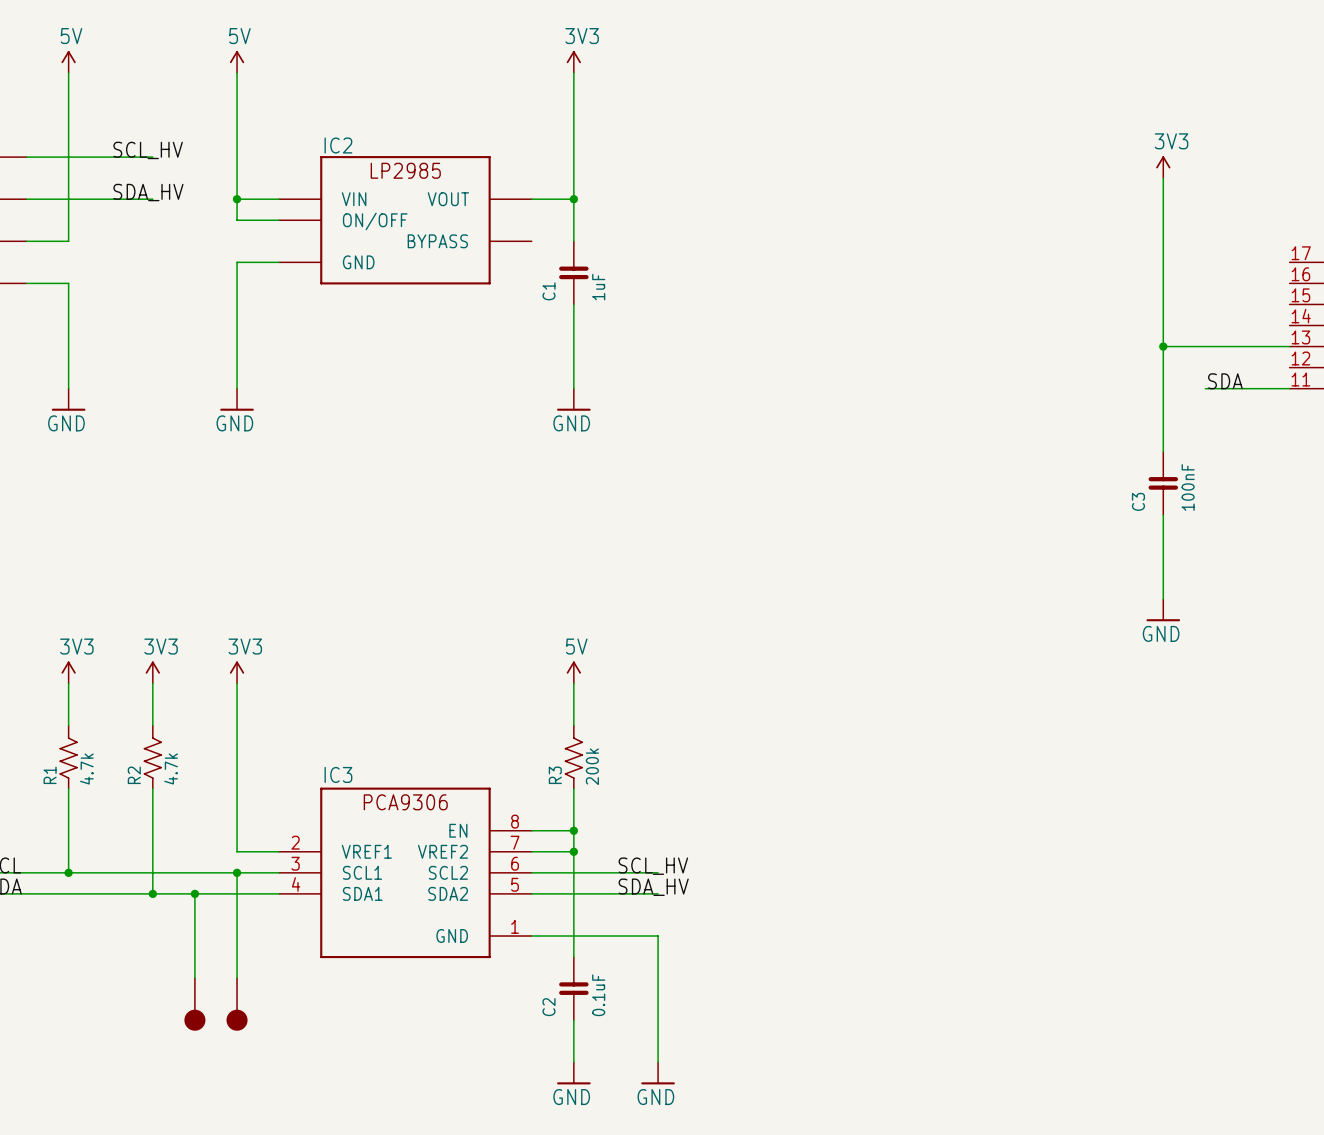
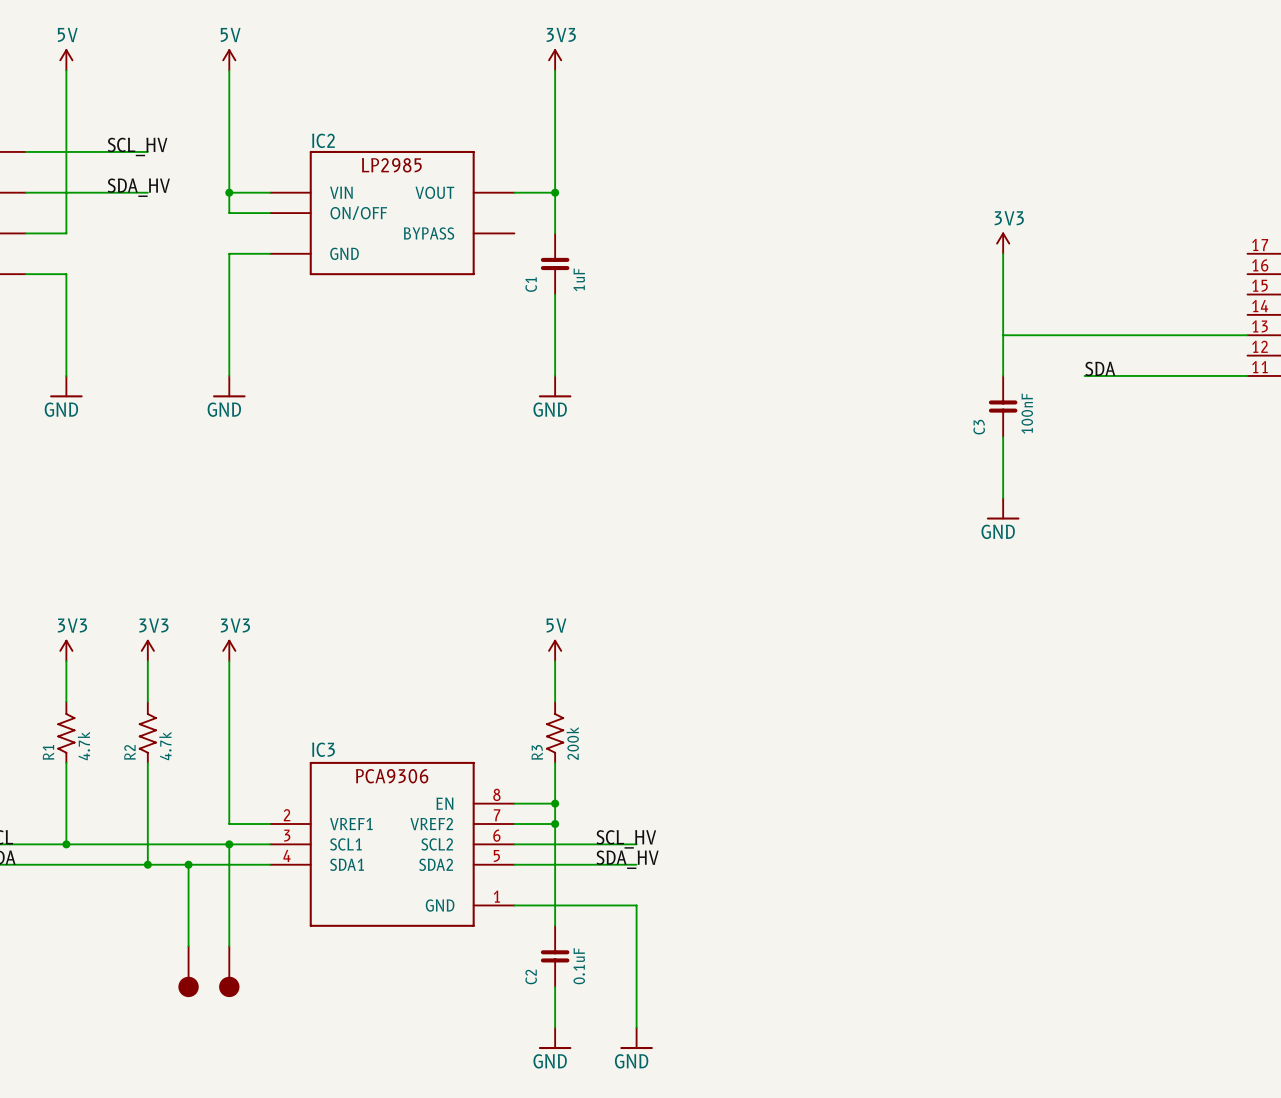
power symbol position: 3V3 (1163, 167) -> 3V3 (1003, 243)
wire: (1163, 178) (1163, 451) -> none
wire: none -> (1003, 253) (1003, 375)
wire: none -> (1003, 335) (1125, 335)
junction: (1163, 346) -> none
label position: SDA (1225, 381) -> SDA (1100, 368)
wire: none -> (1084, 375) (1166, 375)
wire: none -> (1003, 437) (1003, 498)
C3 position: (1163, 483) -> (1003, 406)
wire: (1163, 514) (1163, 599) -> none
power symbol position: GND (1163, 610) -> GND (1003, 508)

